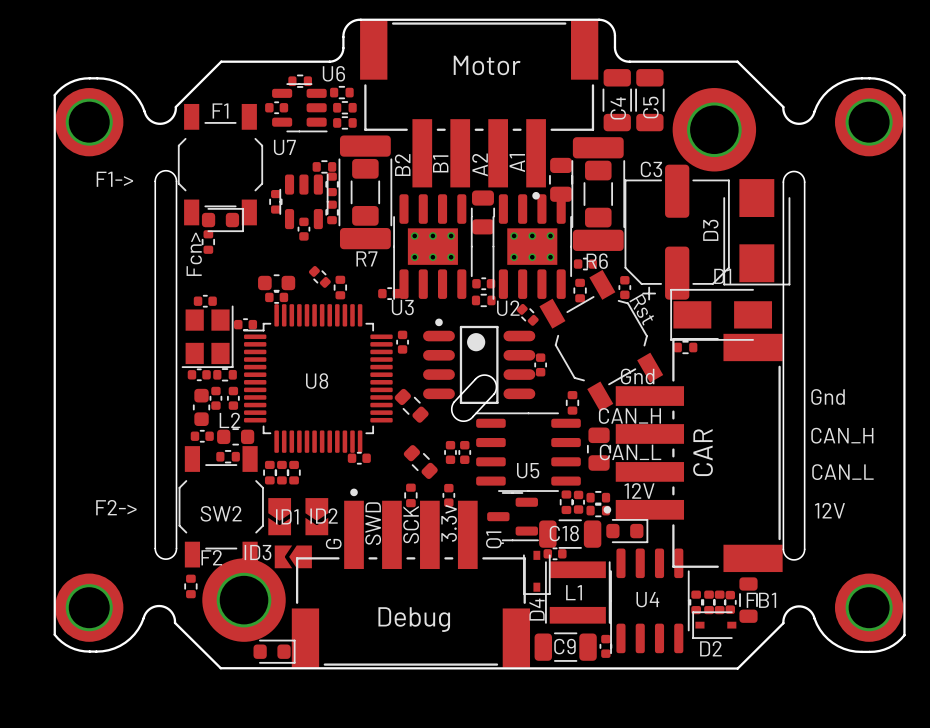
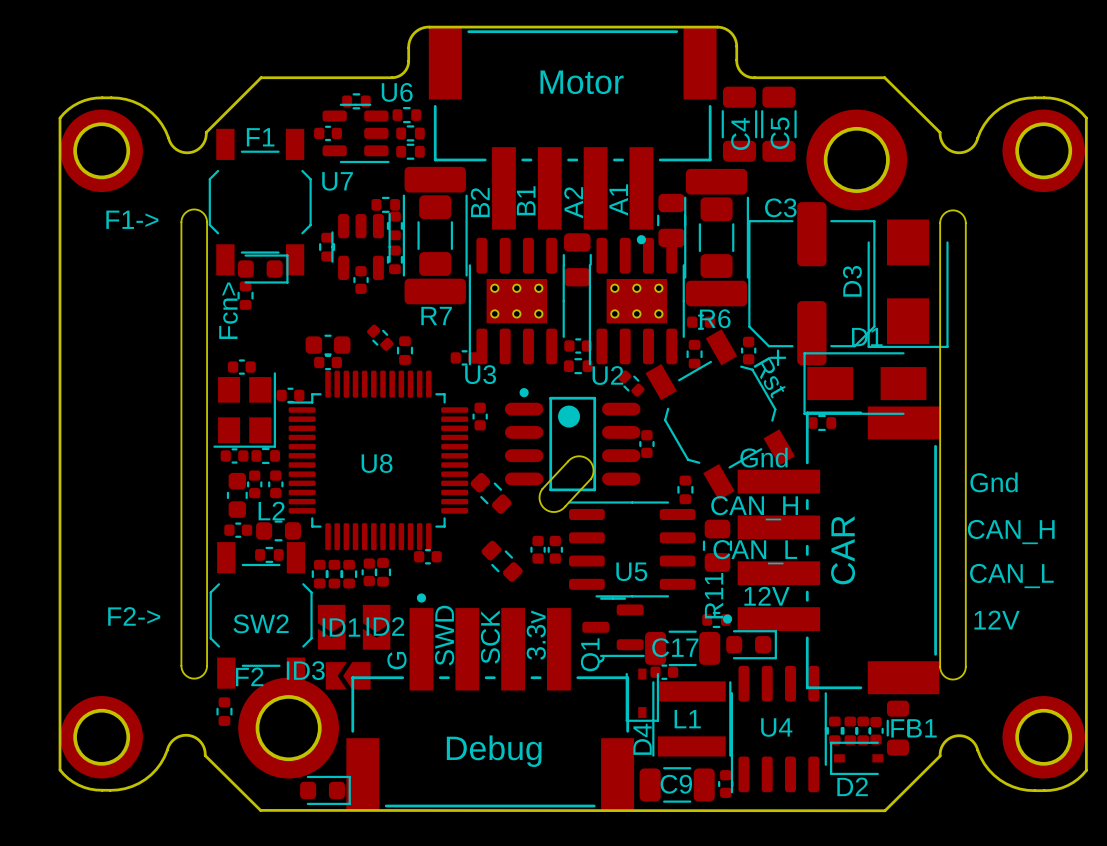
part: none -> (369, 572)
R11 name: none -> R11 (714, 595)
part position: (410, 495) -> (383, 572)
part: (448, 495) -> none
part: (598, 497) -> none
part: (566, 502) -> none
part: (578, 502) -> none
C18 name: C18 (564, 533) -> C17 (675, 647)

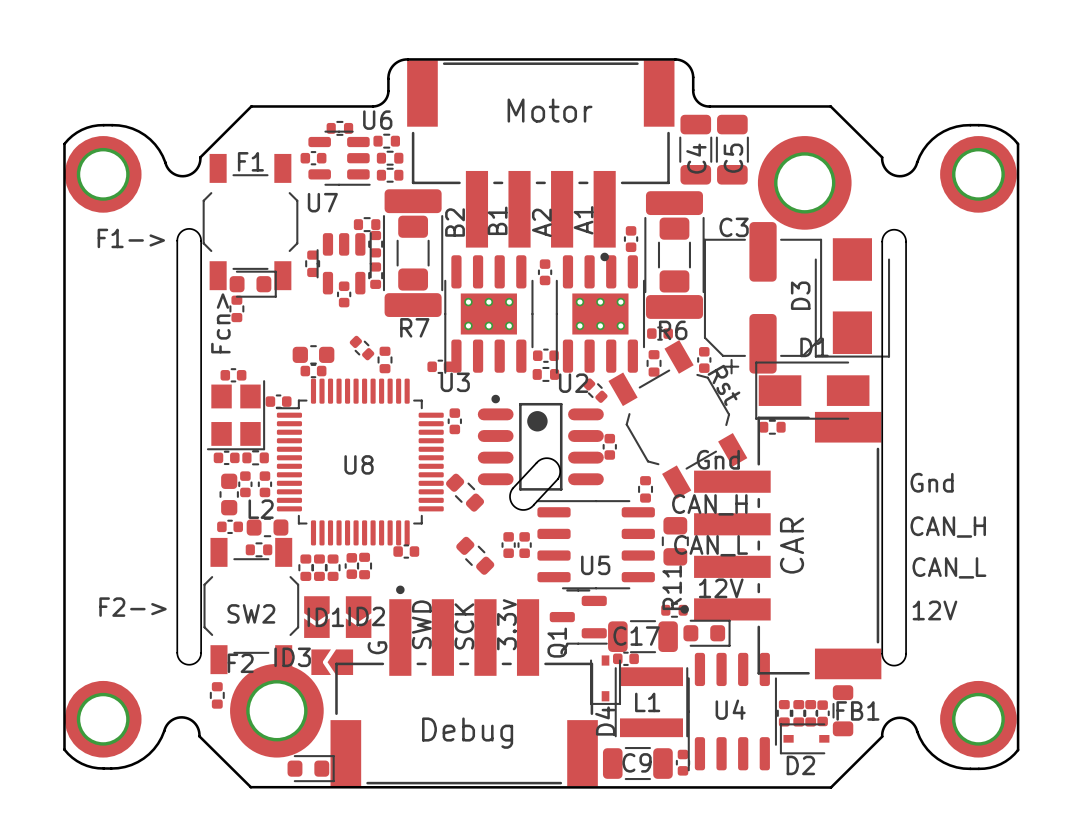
part footprint: [657, 193, 687, 248] -> [623, 226, 639, 253]
part footprint: [562, 233, 592, 287] -> [537, 259, 553, 286]

